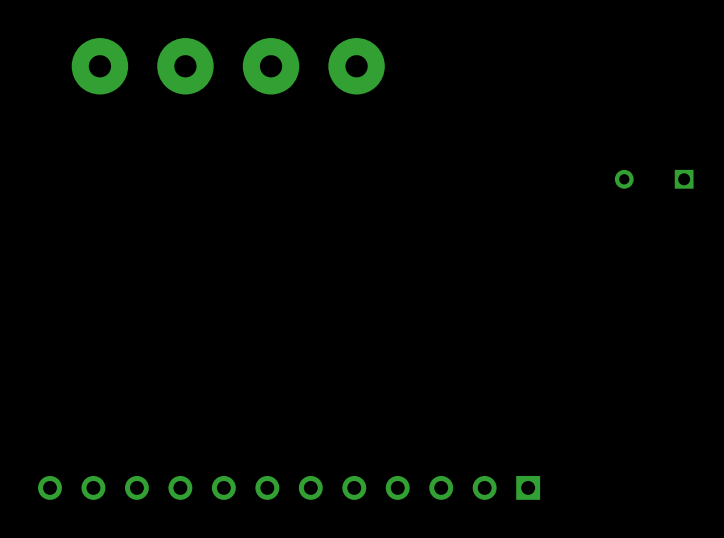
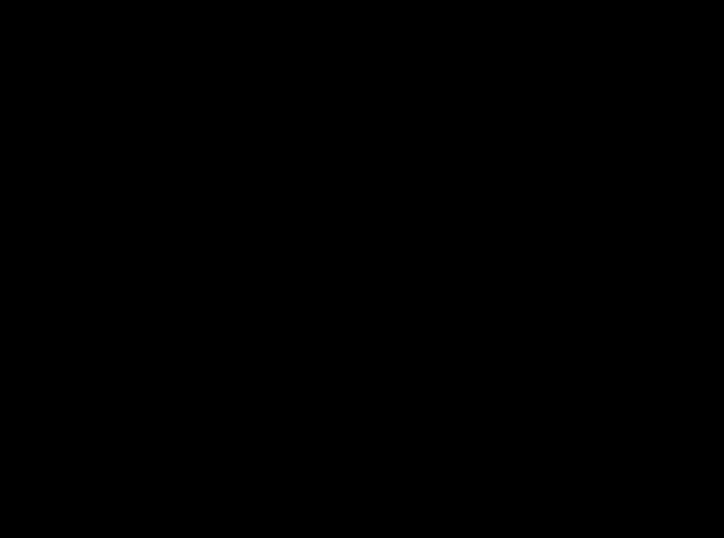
part: (228, 66) -> none
part: (654, 179) -> none
part: (289, 487) -> none

